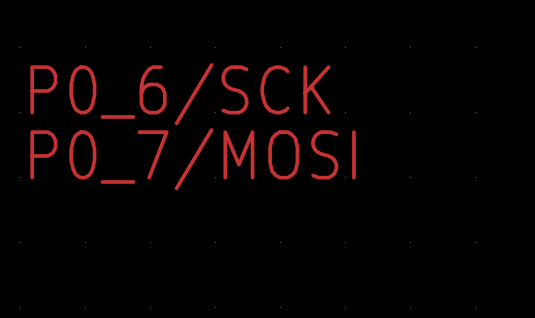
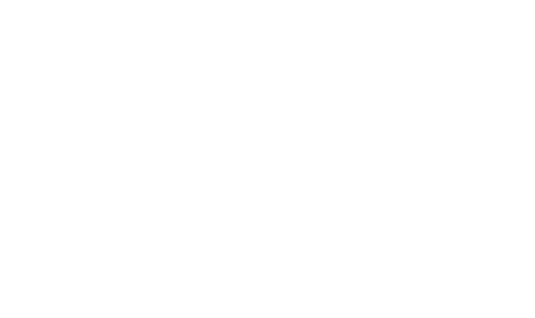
text: P0_6/SCK (180, 94) -> none
text: P0_7/MOSI (193, 159) -> none

